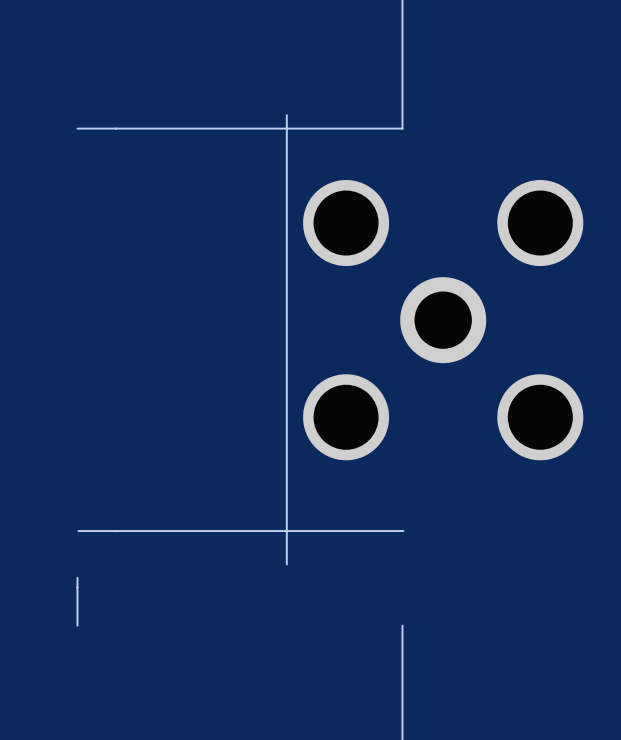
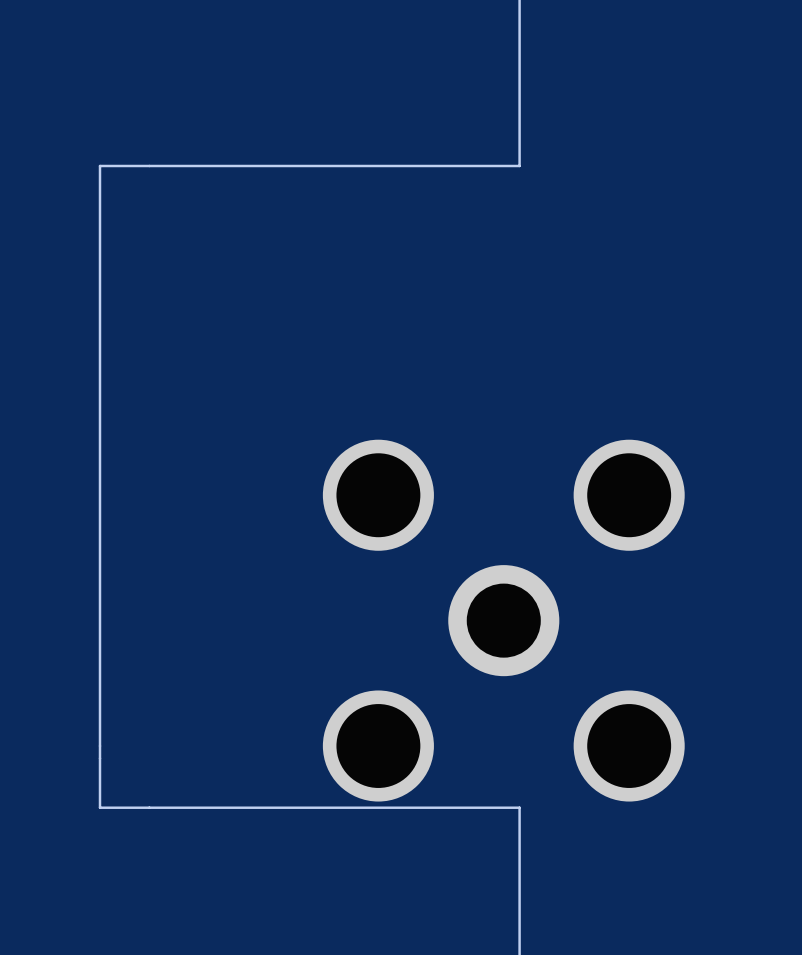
board edge: (286, 115) (286, 564) -> (99, 165) (99, 746)
part position: (443, 320) -> (503, 620)
board edge: (403, 531) (78, 531) -> (519, 807) (99, 807)

